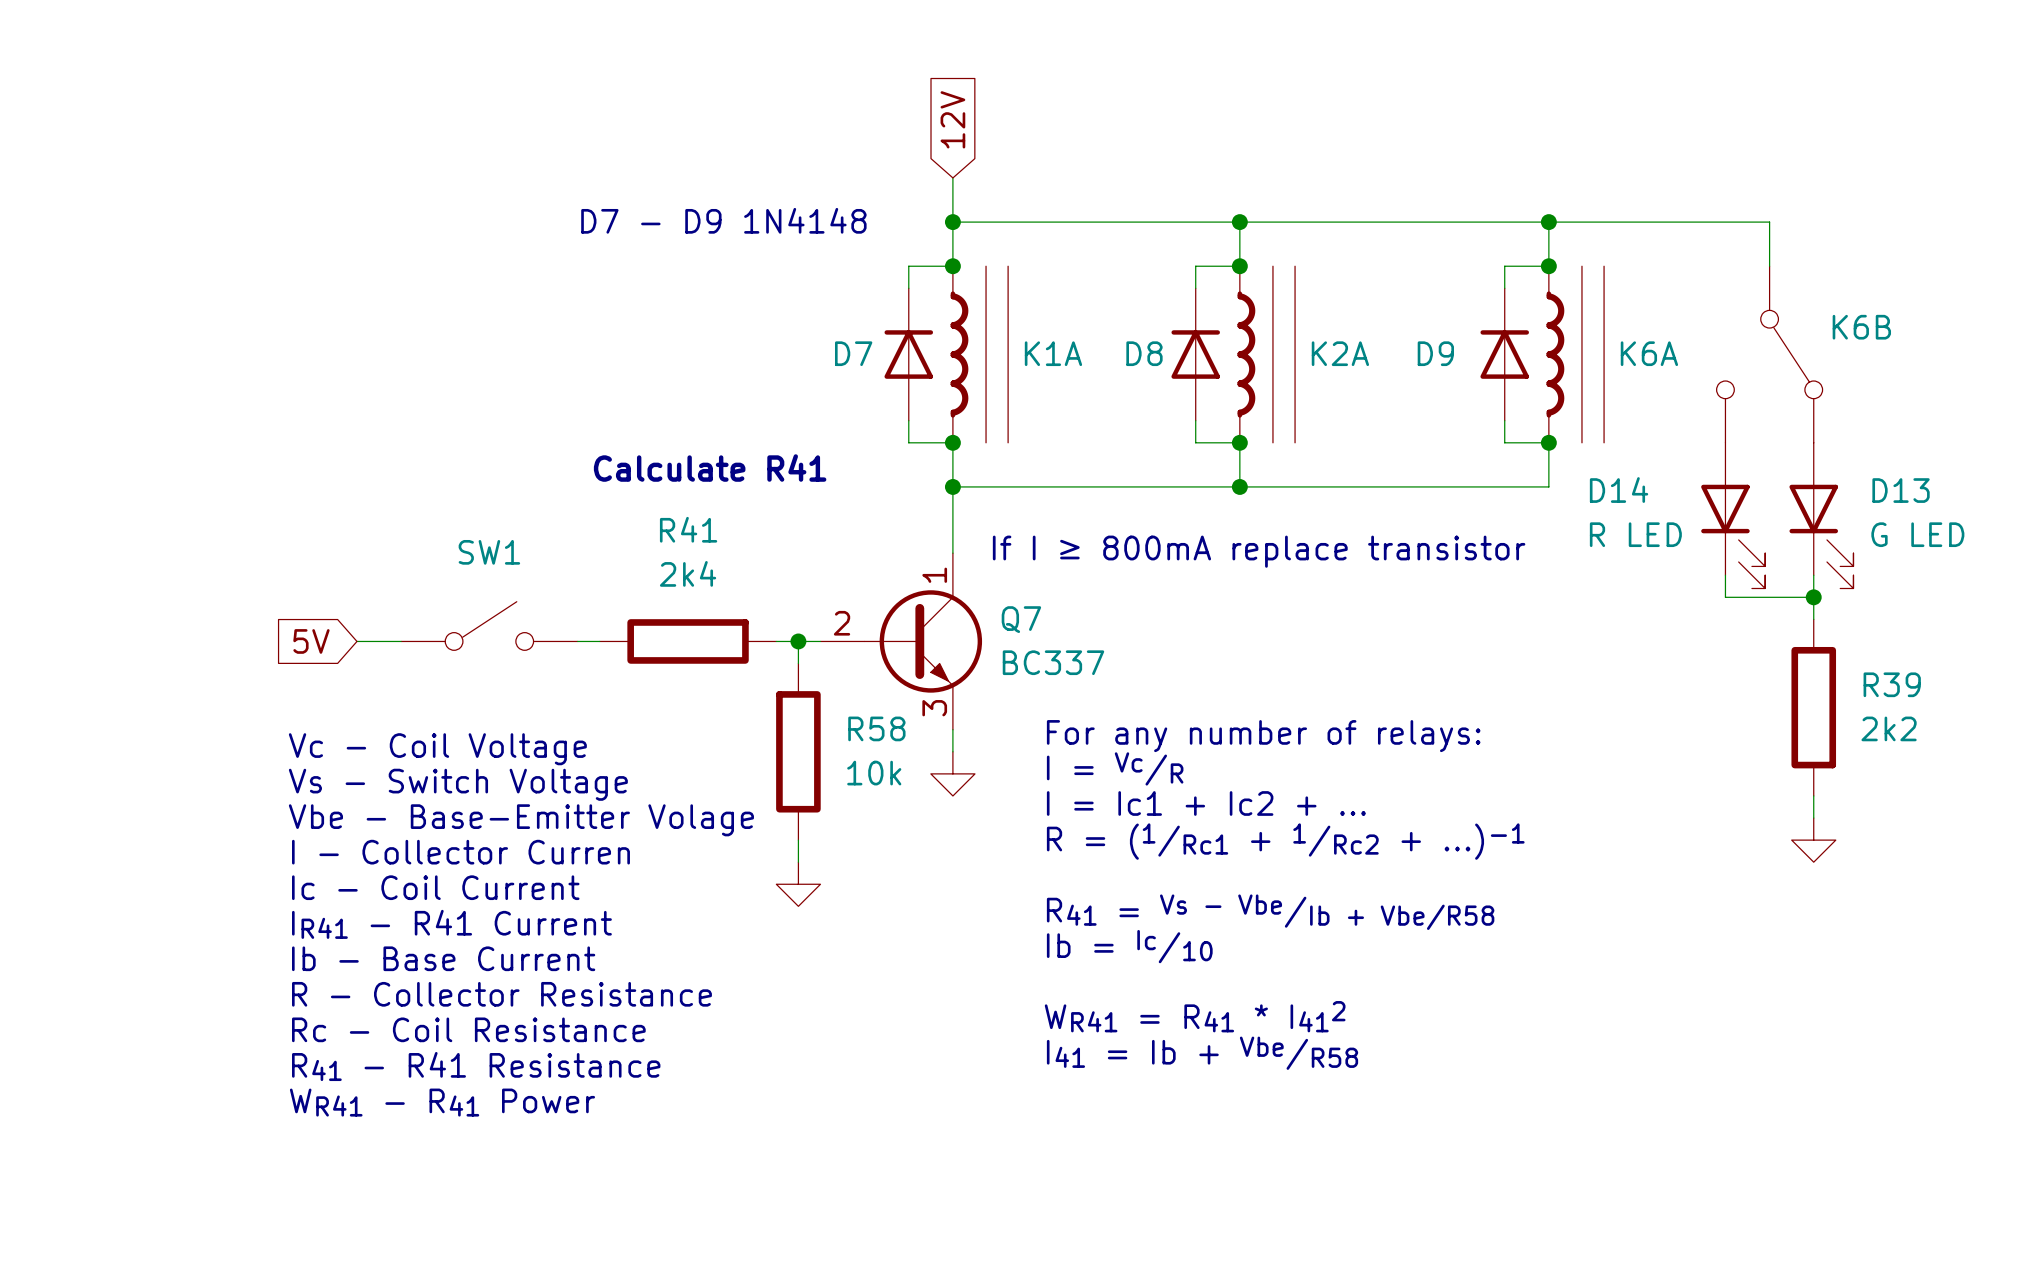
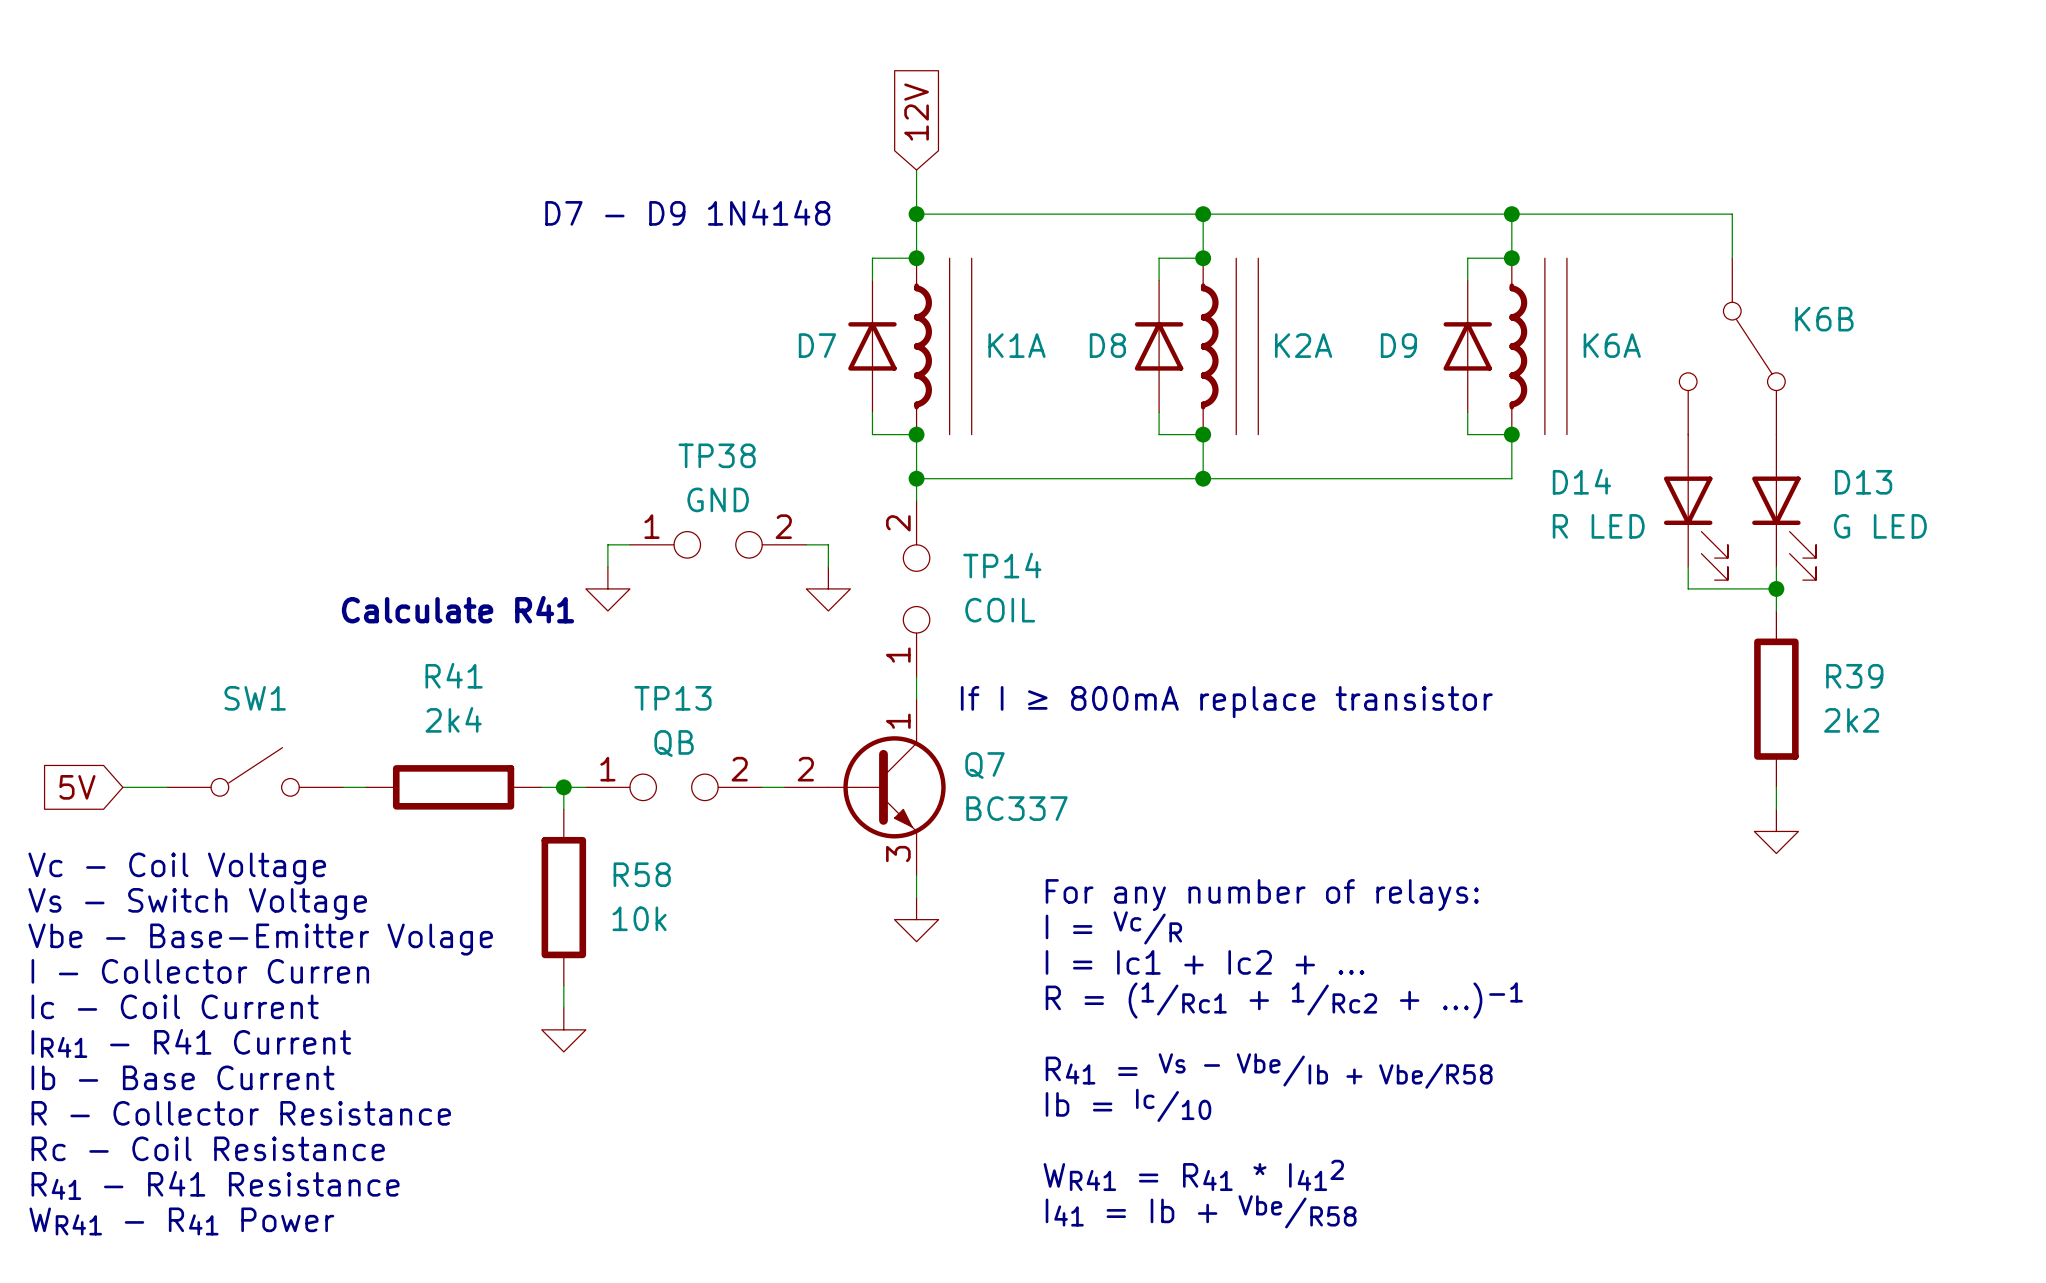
text position: Calculate R41 (710, 468) -> Calculate R41 (457, 609)
text position: If I ≥ 800mA replace transistor (1259, 551) -> If I ≥ 800mA replace transistor (1226, 702)
wire: none -> (629, 544) (607, 544) (607, 566)
TP38: none -> GND (718, 544)
wire: none -> (806, 544) (828, 544) (828, 566)
power symbol: none -> (607, 588)
power symbol: none -> (828, 588)
TP14: none -> COIL (916, 588)
SW1 position: (489, 626) -> (255, 771)
global label position: 5V (311, 641) -> 5V (77, 787)
wire: (356, 641) (401, 641) -> (122, 787) (166, 787)
wire: (577, 641) (599, 641) -> (343, 787) (365, 787)
R41 position: (688, 641) -> (453, 787)
wire: (776, 641) (820, 641) -> (541, 787) (585, 787)
wire: (798, 641) (798, 663) -> (563, 787) (563, 809)
junction: (798, 641) -> none
Q7 position: (901, 641) -> (864, 787)
text position: For any number of relays: (1263, 736) -> For any number of relays: (1262, 895)
text position: Vc - Coil Voltage (437, 749) -> Vc - Coil Voltage (177, 868)
R58 position: (798, 751) -> (563, 897)
text position: I = Vc/R (1115, 768) -> I = Vc/R (1113, 927)
power symbol: (952, 773) -> none
text position: Vs - Switch Voltage (458, 784) -> Vs - Switch Voltage (197, 904)
junction: none -> (563, 787)
TP13: none -> QB (674, 787)
wire: none -> (762, 787) (784, 787)
text position: I = Ic1 + Ic2 + ... (1206, 803) -> I = Ic1 + Ic2 + ... (1205, 962)
text position: Vbe - Base-Emitter Volage (521, 820) -> Vbe - Base-Emitter Volage (260, 939)
wire: (798, 840) (798, 862) -> (563, 985) (563, 1007)
text position: R = (1/Rc1 + 1/Rc2 + ...)-1 (1285, 841) -> R = (1/Rc1 + 1/Rc2 + ...)-1 (1284, 1000)
text position: I - Collector Curren (460, 852) -> I - Collector Curren (200, 971)
power symbol: (798, 884) -> none
wire: none -> (916, 875) (916, 897)
text position: Ic - Coil Current (435, 887) -> Ic - Coil Current (175, 1006)
text position: R41 = Vs - Vbe/Ib + Vbe/R58 (1270, 912) -> R41 = Vs - Vbe/Ib + Vbe/R58 (1269, 1071)
text position: IR41 - R41 Current (451, 924) -> IR41 - R41 Current (191, 1043)
power symbol: none -> (916, 919)
text position: Ib = Ic/10 (1129, 946) -> Ib = Ic/10 (1128, 1105)
text position: Ib - Base Current (443, 958) -> Ib - Base Current (182, 1077)
text position: R - Collector Resistance (501, 994) -> R - Collector Resistance (241, 1113)
text position: WR41 = R41 * I412 (1195, 1016) -> WR41 = R41 * I412 (1193, 1175)
text position: Rc - Coil Resistance (468, 1029) -> Rc - Coil Resistance (208, 1148)
power symbol: none -> (563, 1029)
text position: I41 = Ib + Vbe/R58 (1202, 1053) -> I41 = Ib + Vbe/R58 (1201, 1211)
text position: R41 - R41 Resistance (476, 1066) -> R41 - R41 Resistance (215, 1185)
text position: WR41 - R41 Power (442, 1102) -> WR41 - R41 Power (181, 1221)

